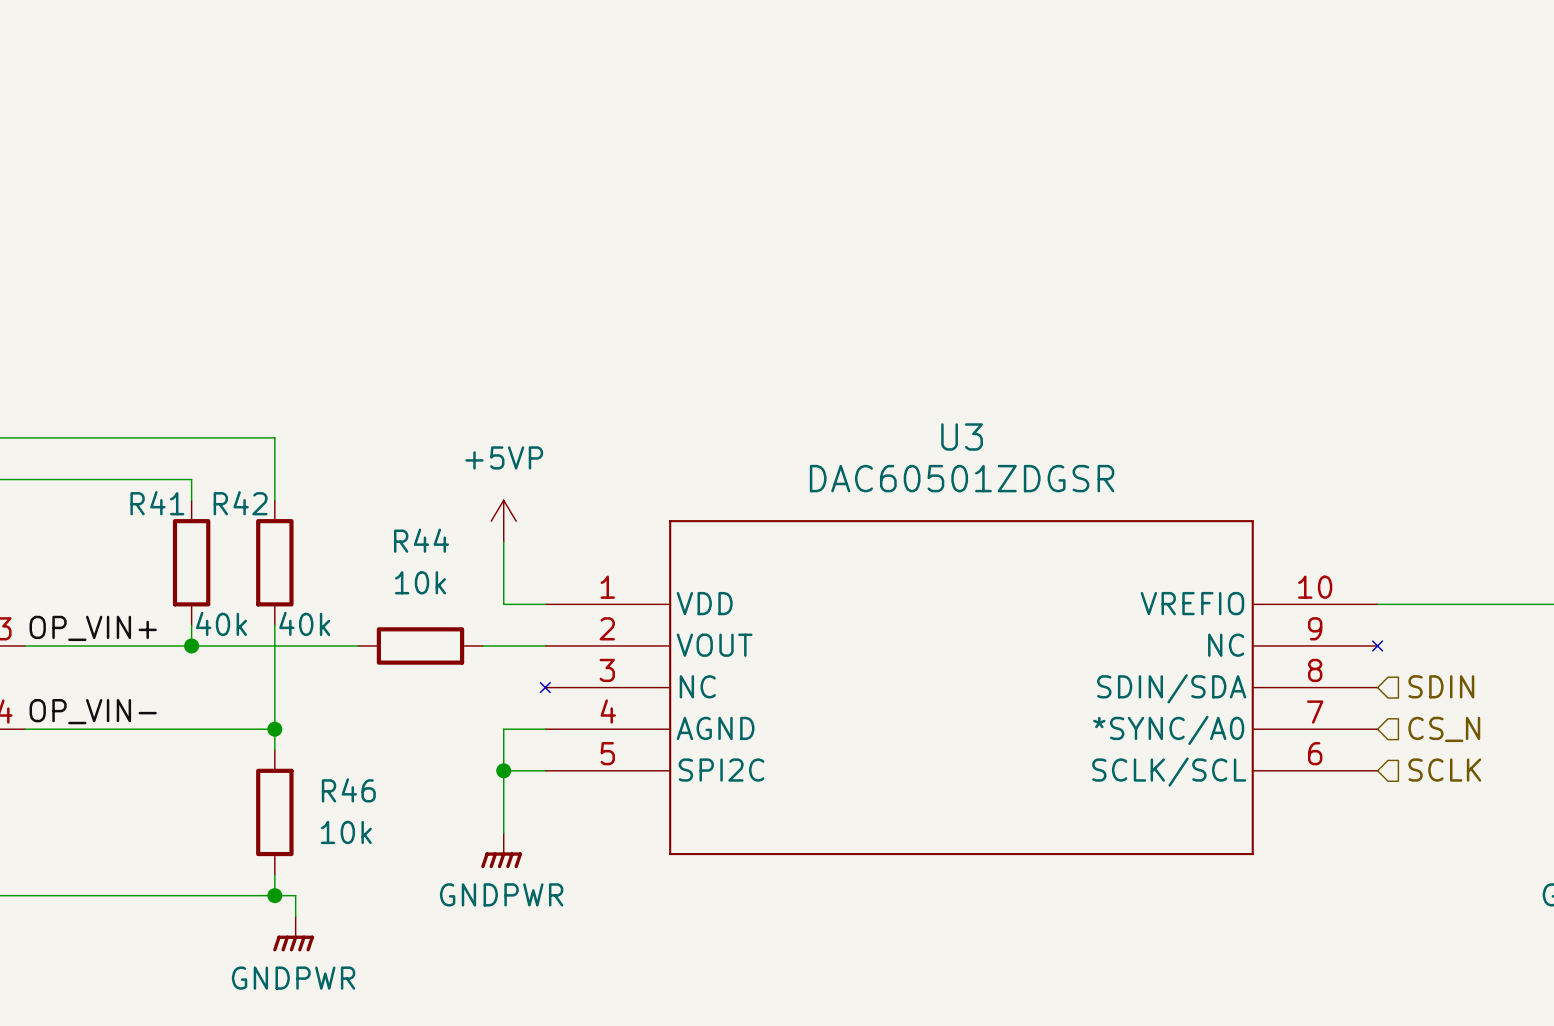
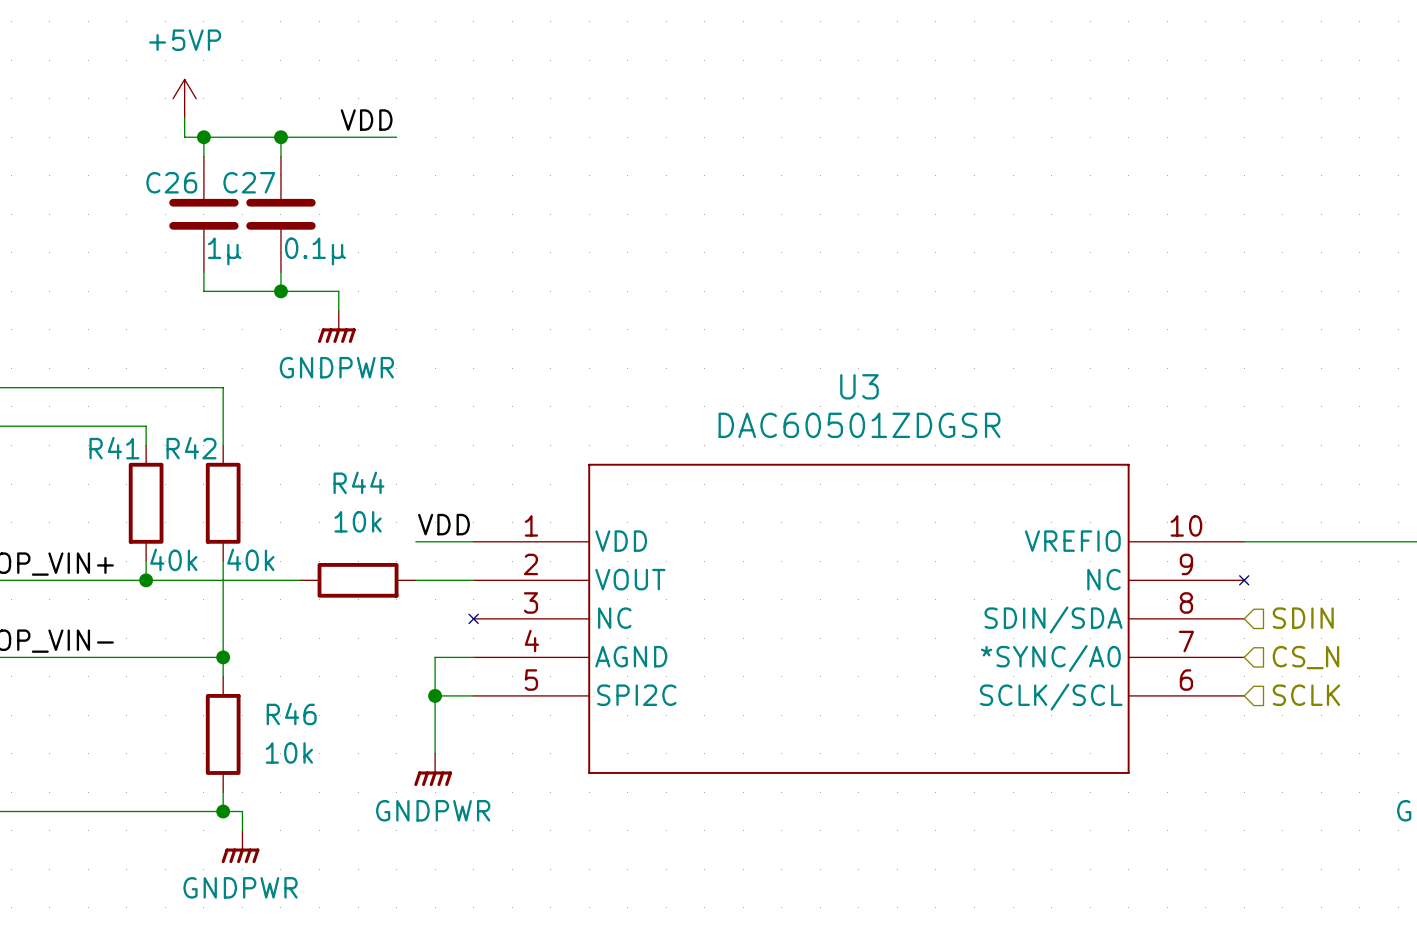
power symbol: none -> +5VP (184, 98)
wire: none -> (184, 117) (184, 137) (396, 137)
label: none -> VDD (366, 120)
wire: none -> (203, 137) (203, 156)
junction: none -> (203, 137)
wire: none -> (280, 137) (280, 156)
junction: none -> (280, 137)
C26: none -> 1μ (203, 214)
C27: none -> 0.1μ (280, 214)
wire: none -> (203, 272) (203, 291) (338, 291) (338, 310)
wire: none -> (280, 272) (280, 291)
junction: none -> (280, 291)
power symbol: none -> GNDPWR (336, 326)
power symbol: +5VP (503, 521) -> none
wire: (503, 541) (503, 604) -> (415, 541) (435, 541)
label: none -> VDD (443, 524)

